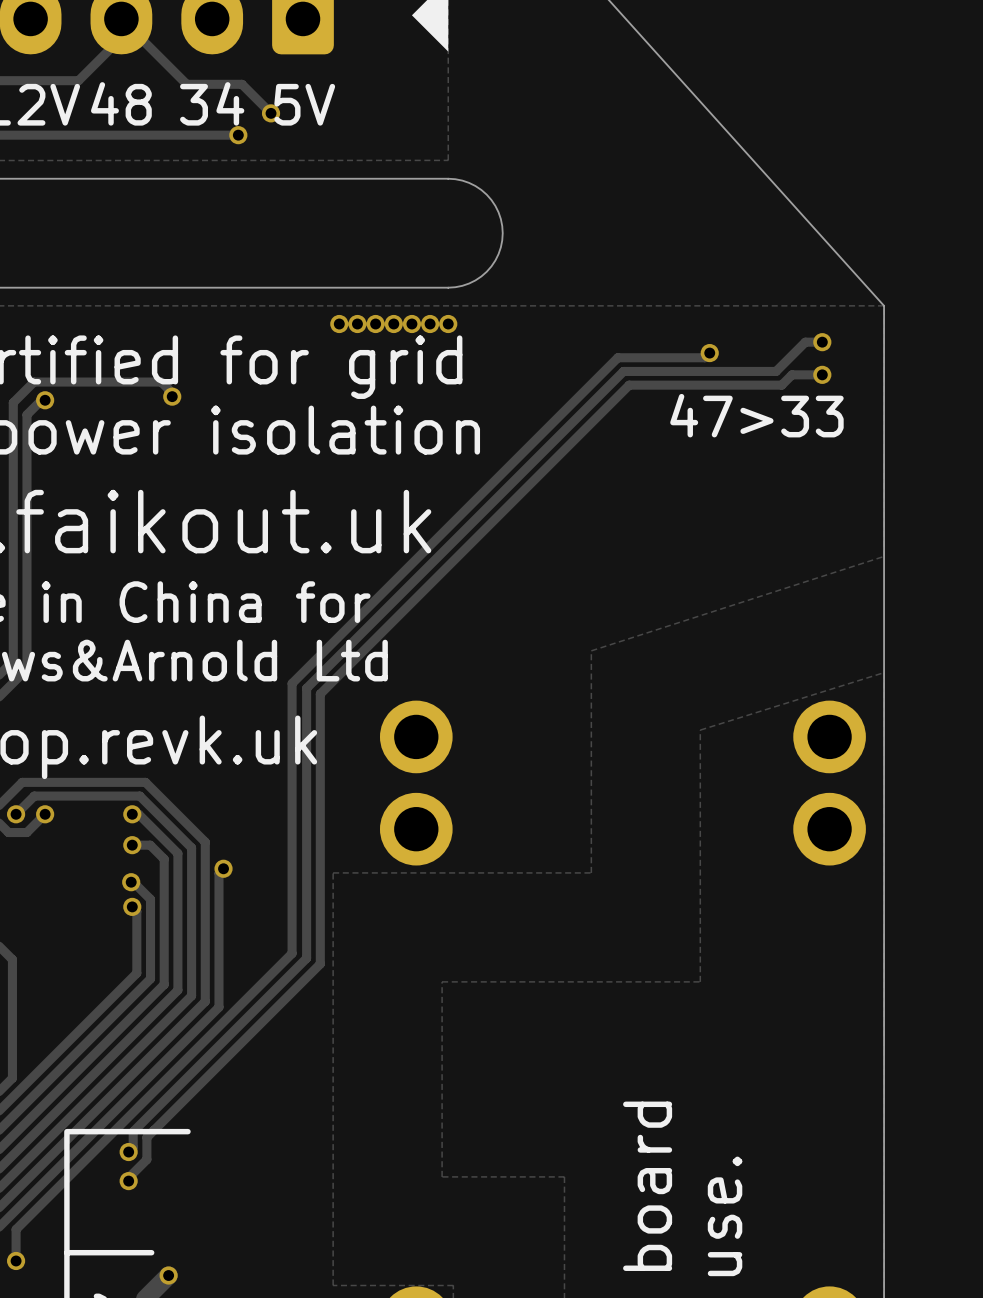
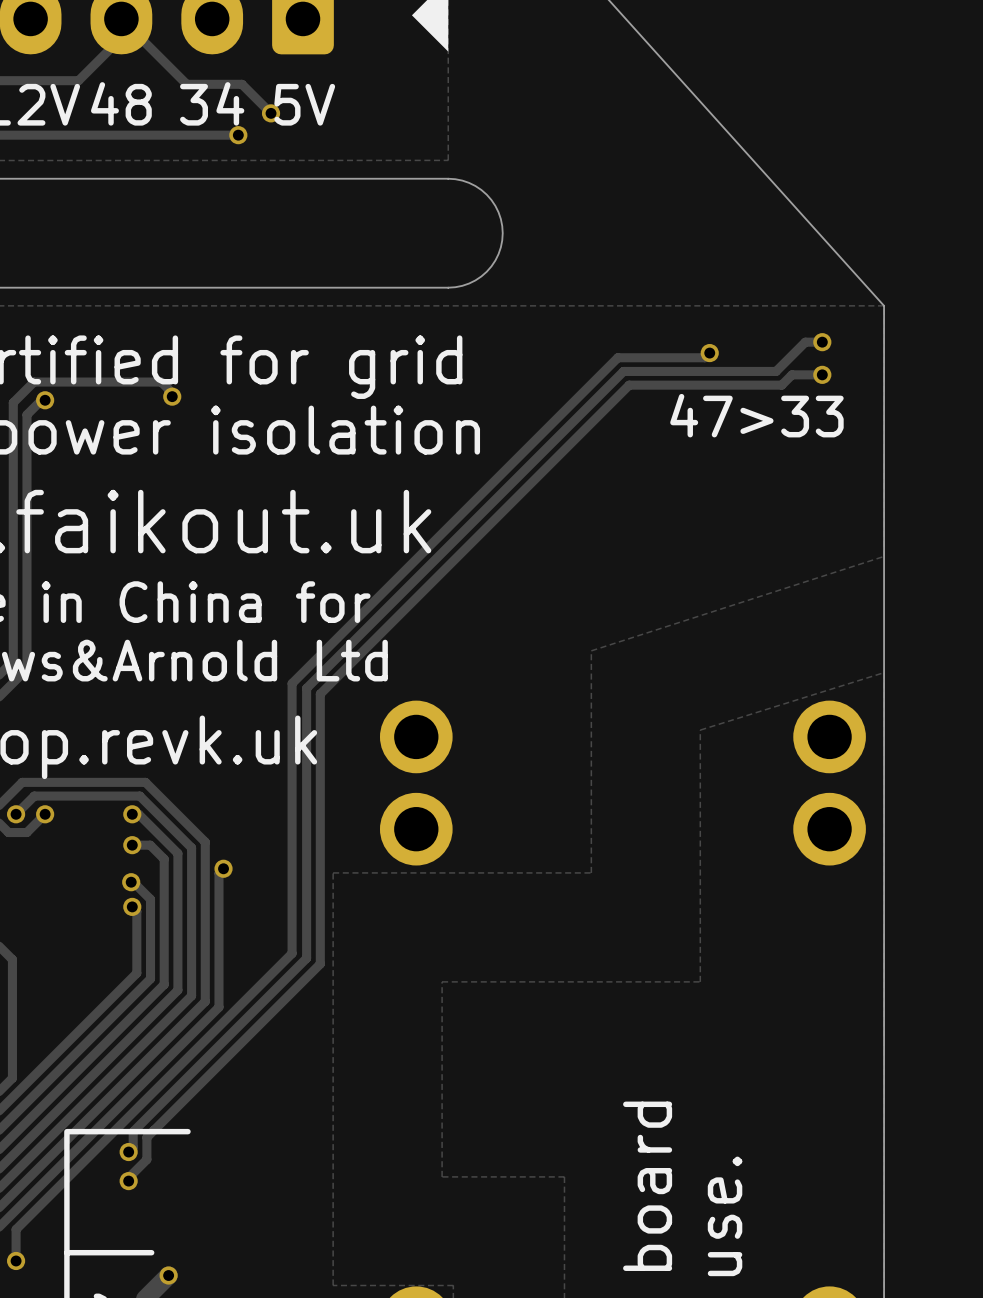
via: (339, 324) -> none
via: (357, 324) -> none
via: (375, 324) -> none
via: (393, 324) -> none
via: (411, 324) -> none
via: (430, 324) -> none
via: (448, 324) -> none

